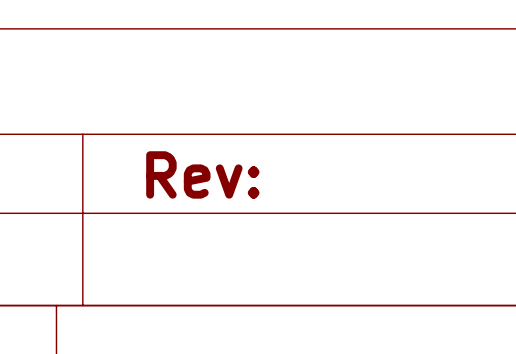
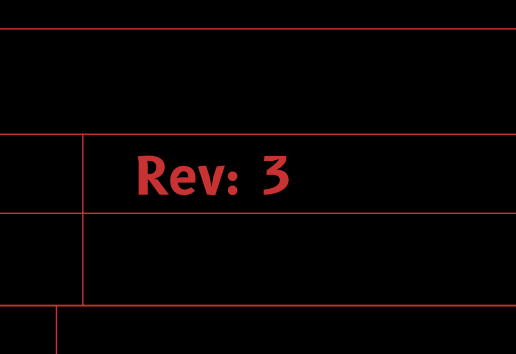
title block: Rev: (202, 174) -> Rev: 3 (213, 175)

